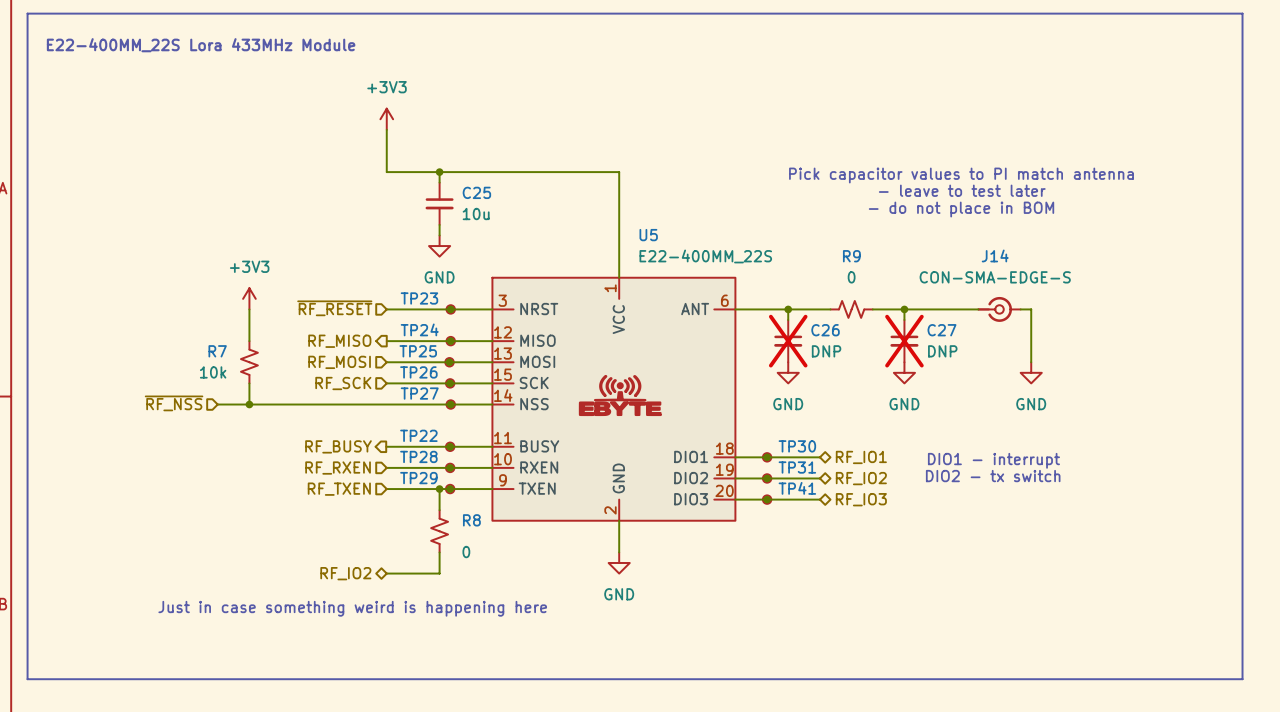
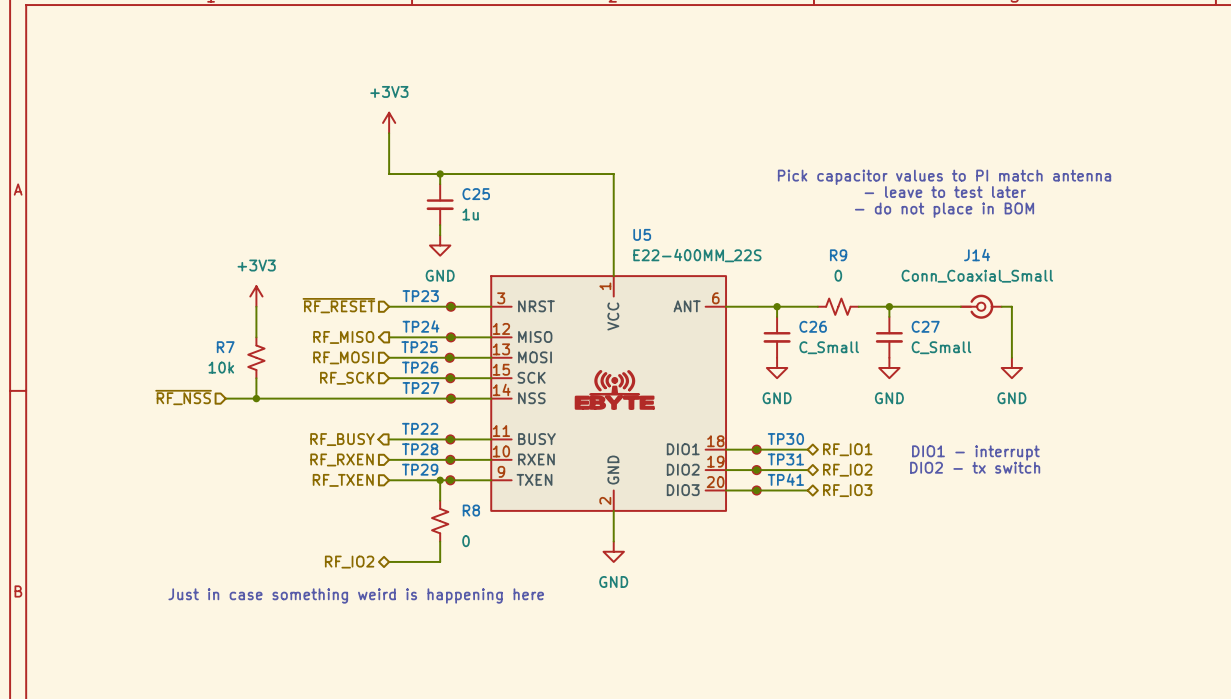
line: (27, 13) (1242, 13) (1242, 679) (27, 679) (27, 13) -> none
text: E22-400MM_22S Lora 433MHz Module (201, 45) -> none
C25 value: 10u (476, 214) -> 1u (470, 214)
J14 value: CON-SMA-EDGE-S (995, 277) -> Conn_Coaxial_Small (977, 276)
C26 do-not-place cross: (788, 341) -> none
C27 do-not-place cross: (904, 341) -> none
C26 value: DNP (826, 351) -> C_Small (829, 347)
C27 value: DNP (942, 351) -> C_Small (941, 347)

